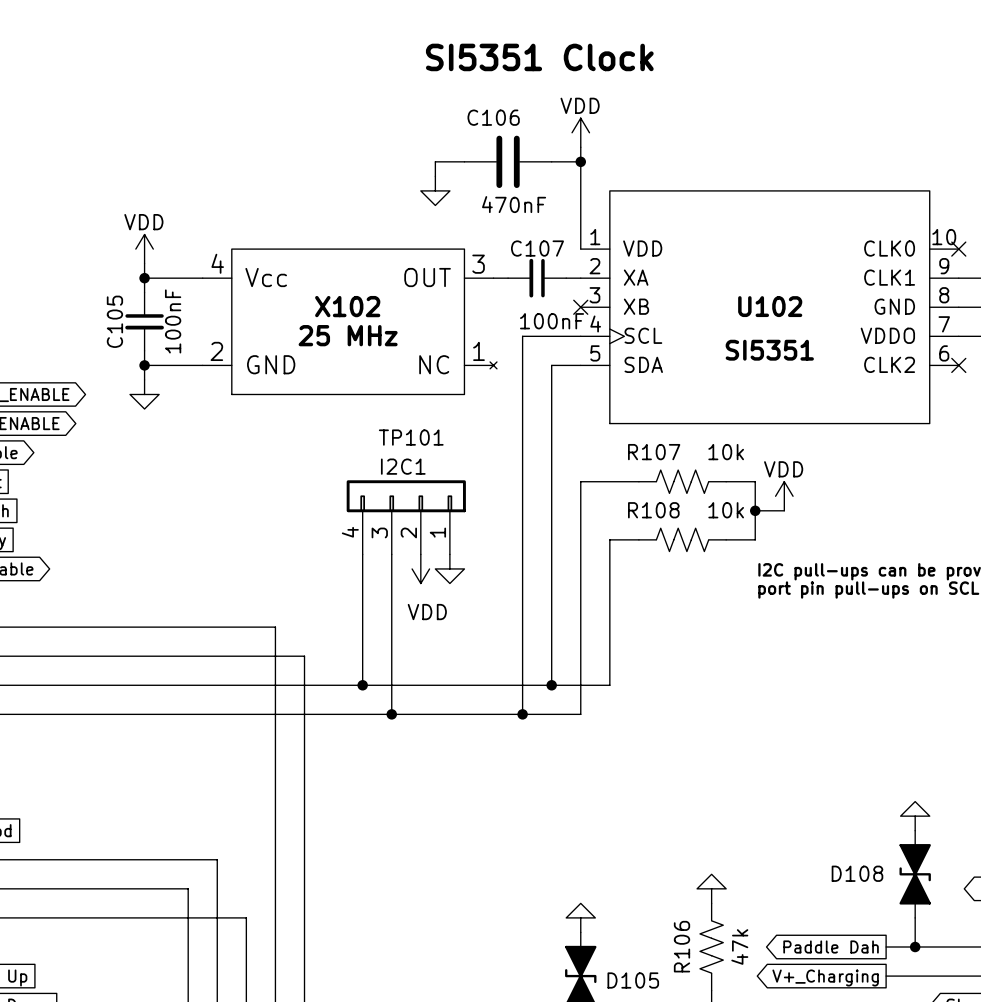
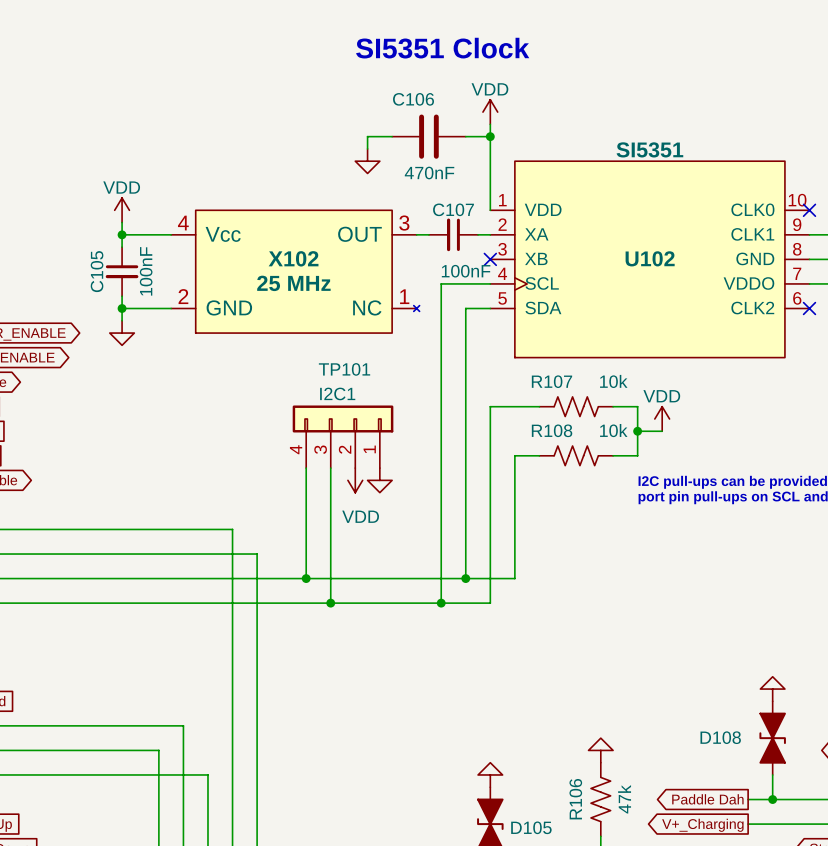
U102 value position: SI5351 (769, 350) -> SI5351 (649, 149)

